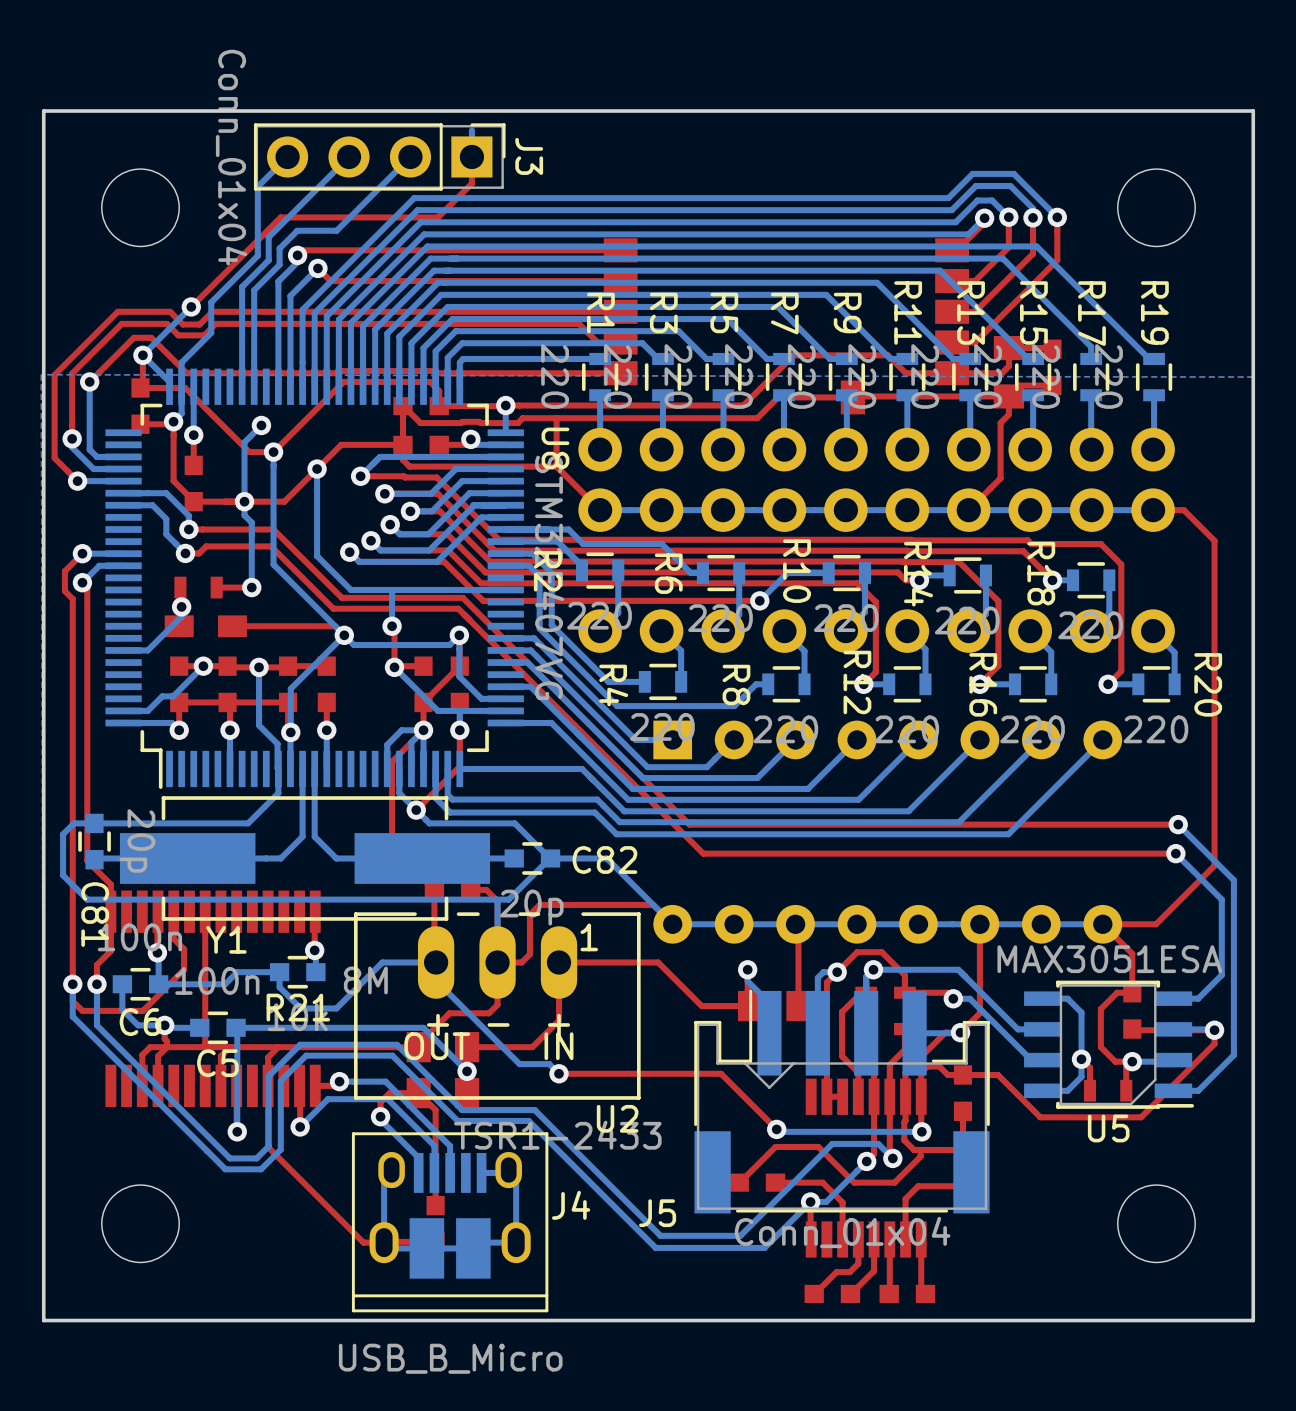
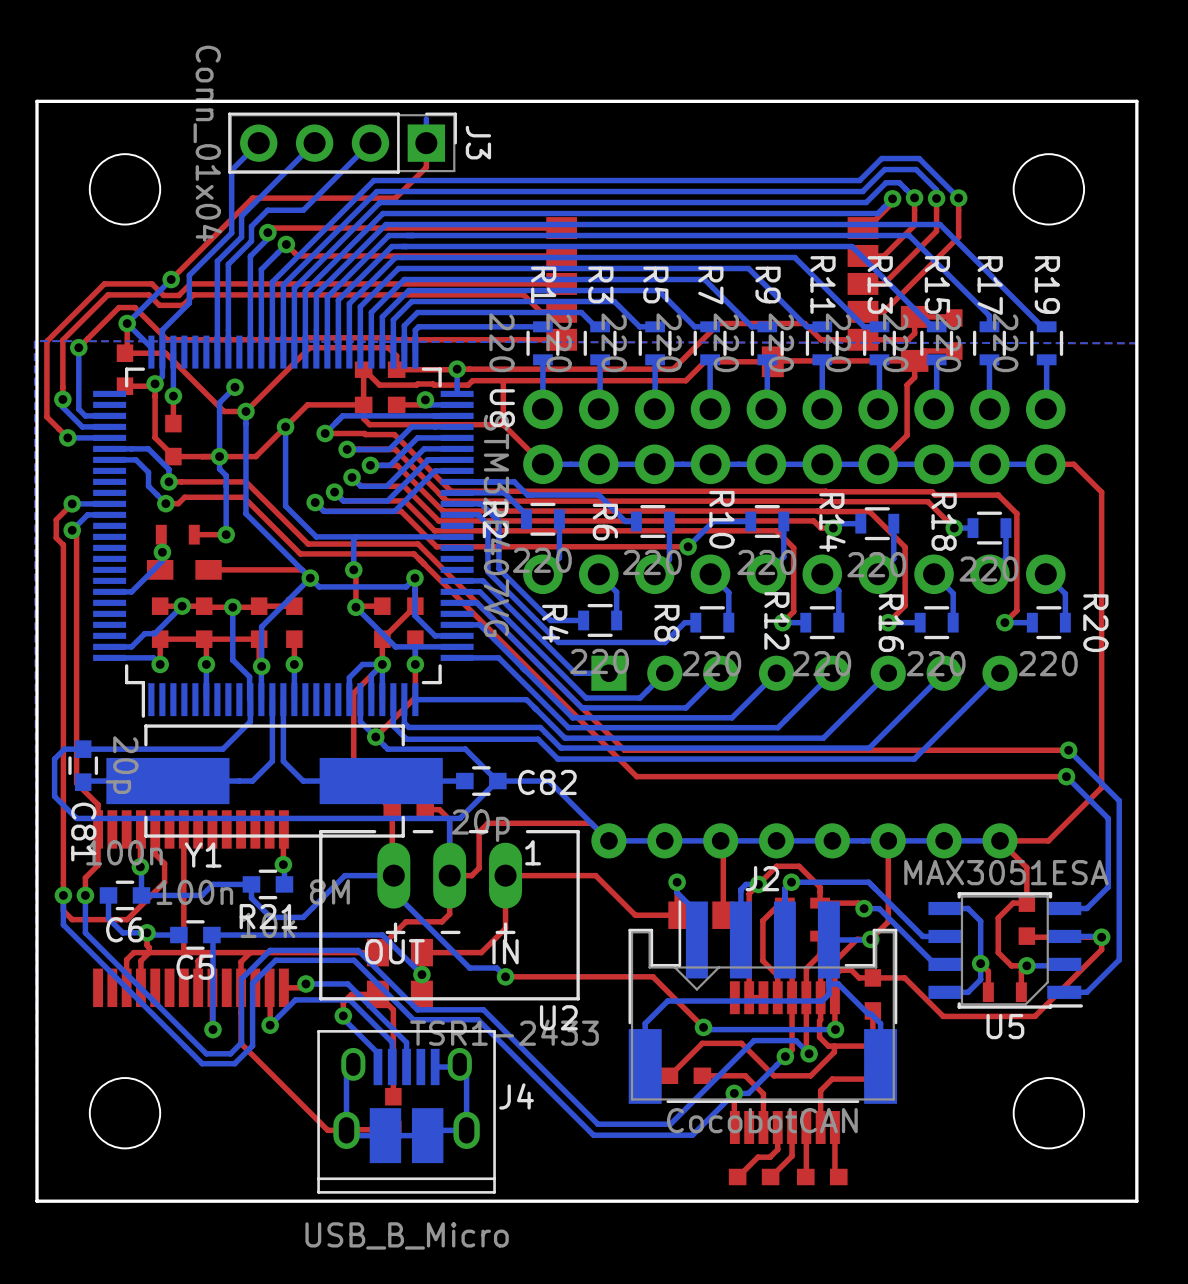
bottom track: none -> (828, 939) (828, 994) (822, 1001) (667, 1001) (645, 1023) (645, 1066)
bottom track: none -> (828, 983) (838, 983) (880, 1023) (880, 1066)
J5 name: J5 (657, 1213) -> J2 (762, 878)
J5 value: Conn_01x04 (842, 1232) -> CocobotCAN (762, 1120)

